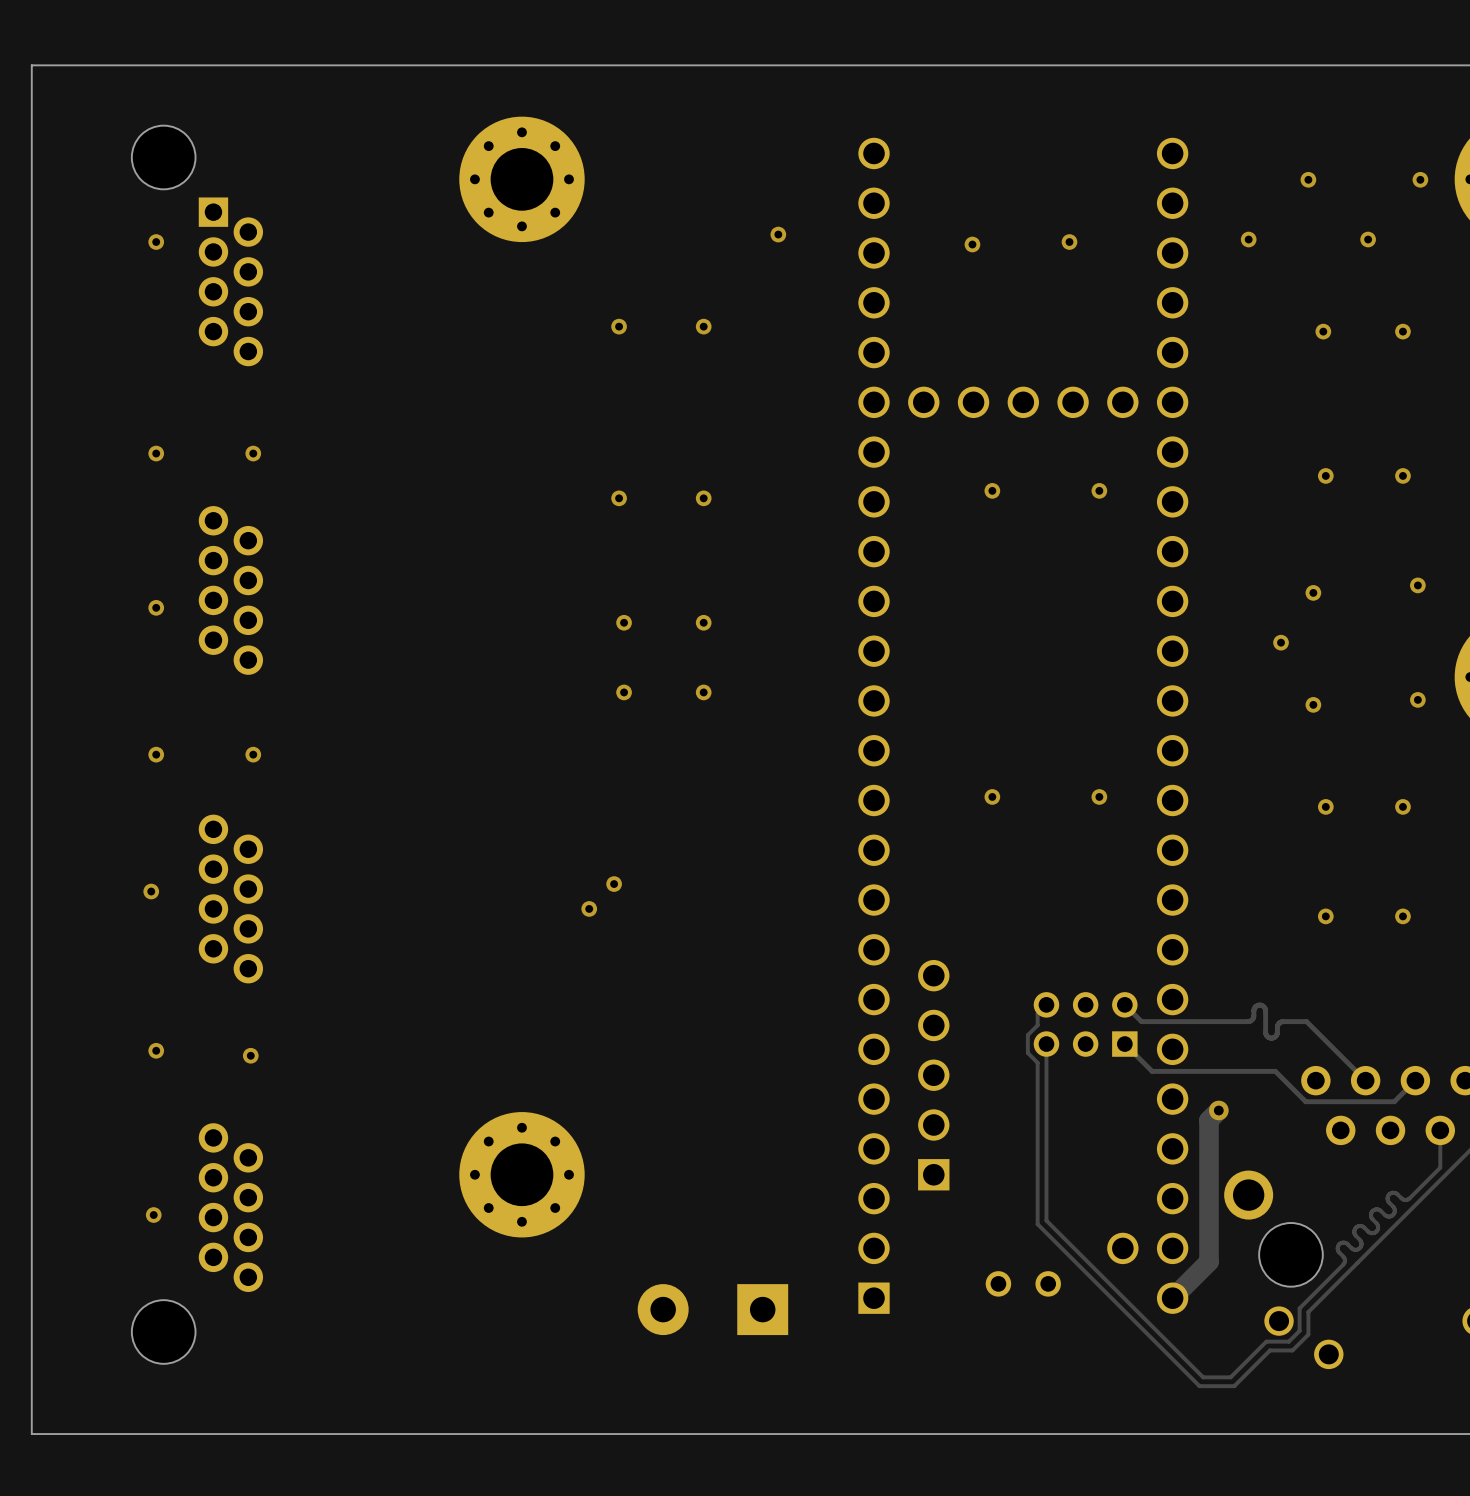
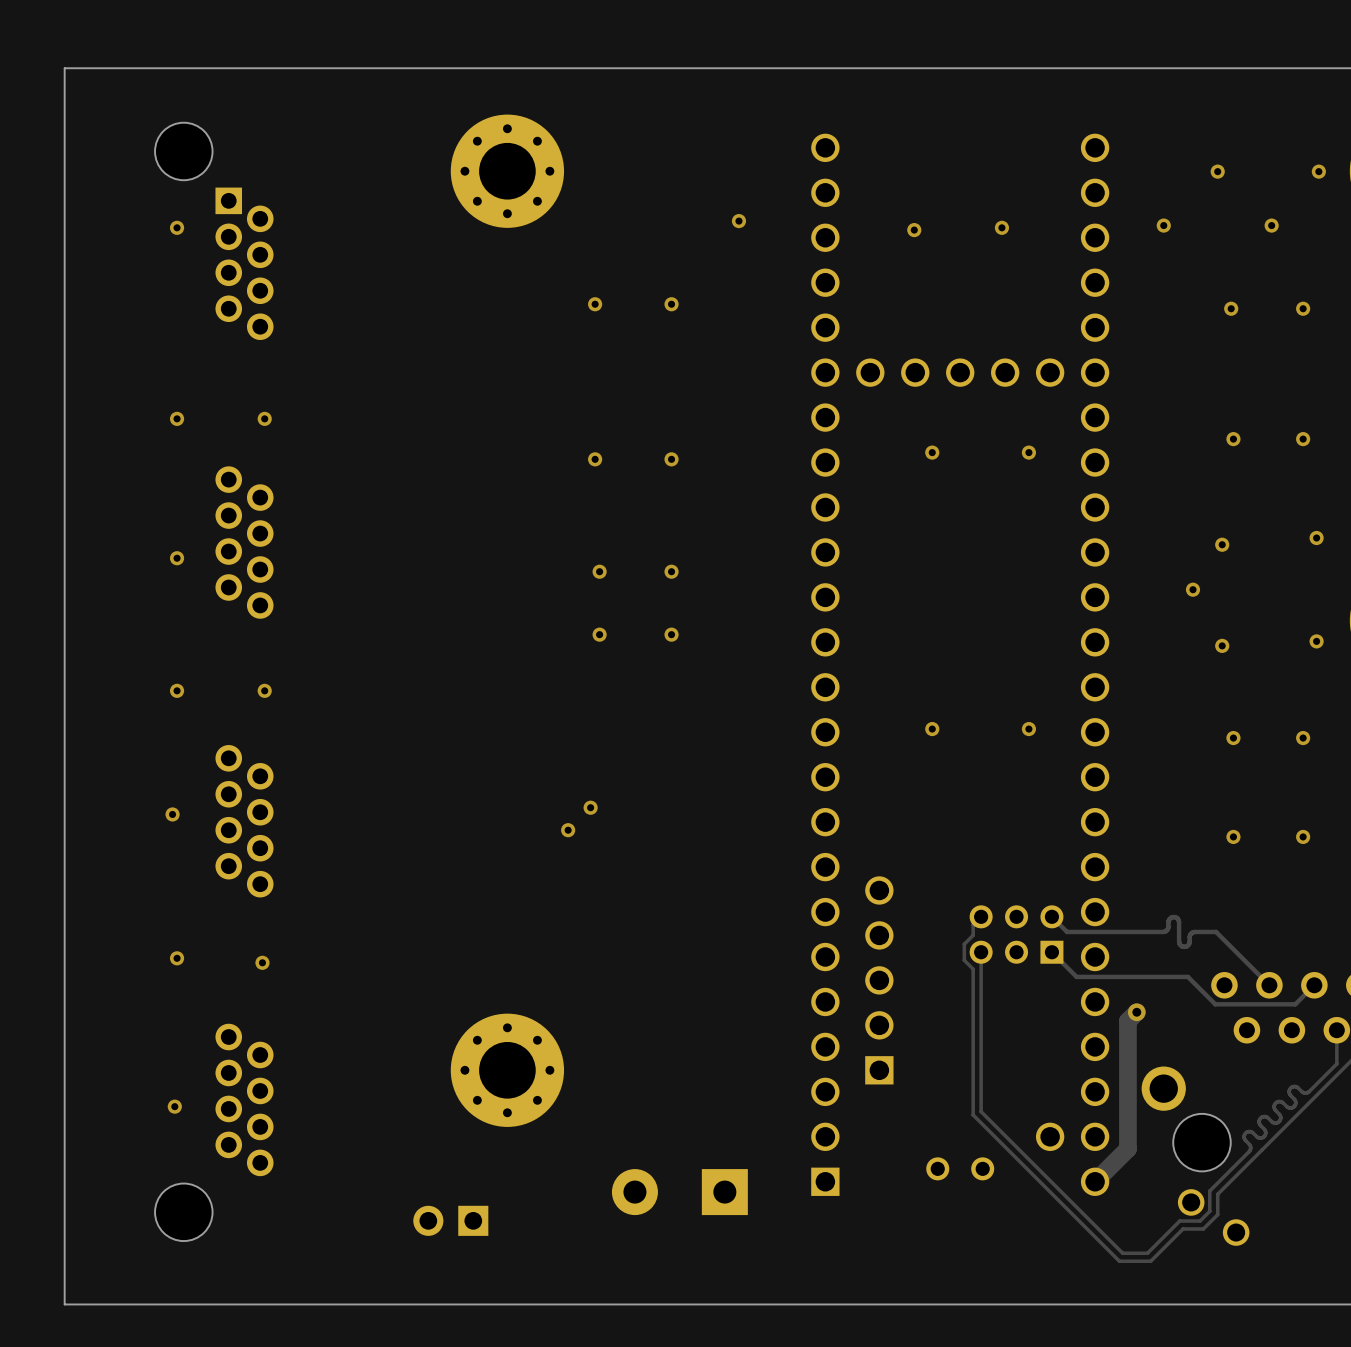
part: none -> (450, 1220)

